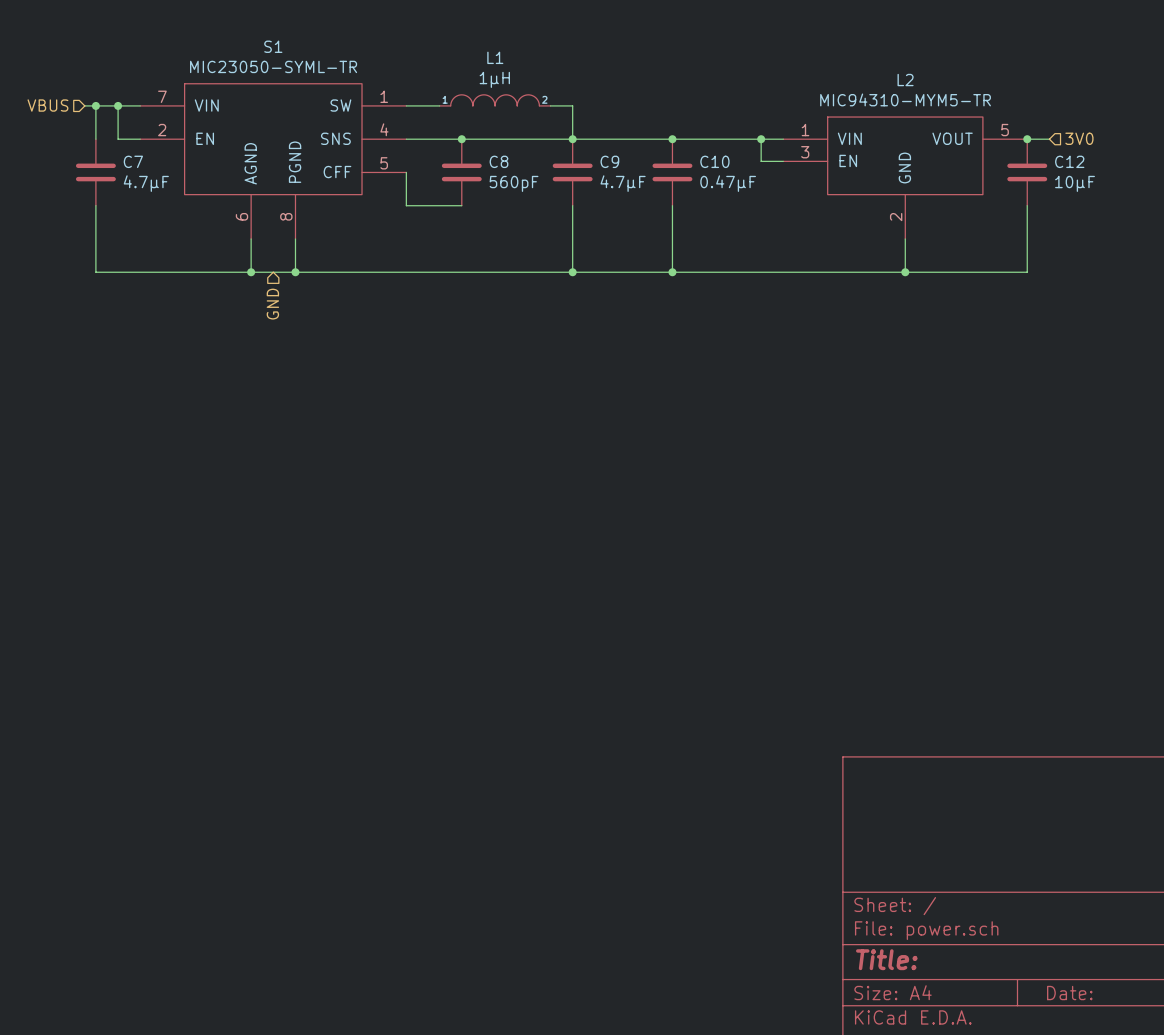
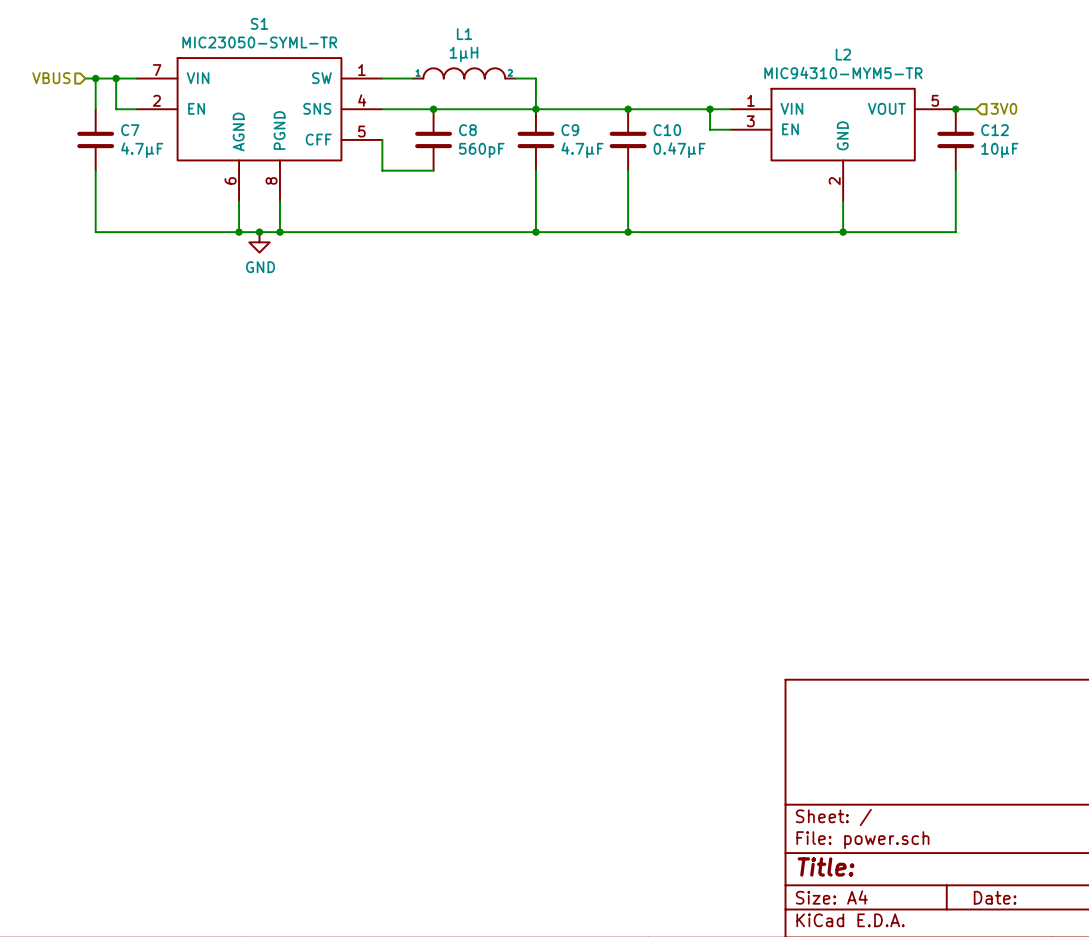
junction: none -> (259, 232)
power symbol: none -> GND (259, 242)
hierarchical label: GND (272, 304) -> none

